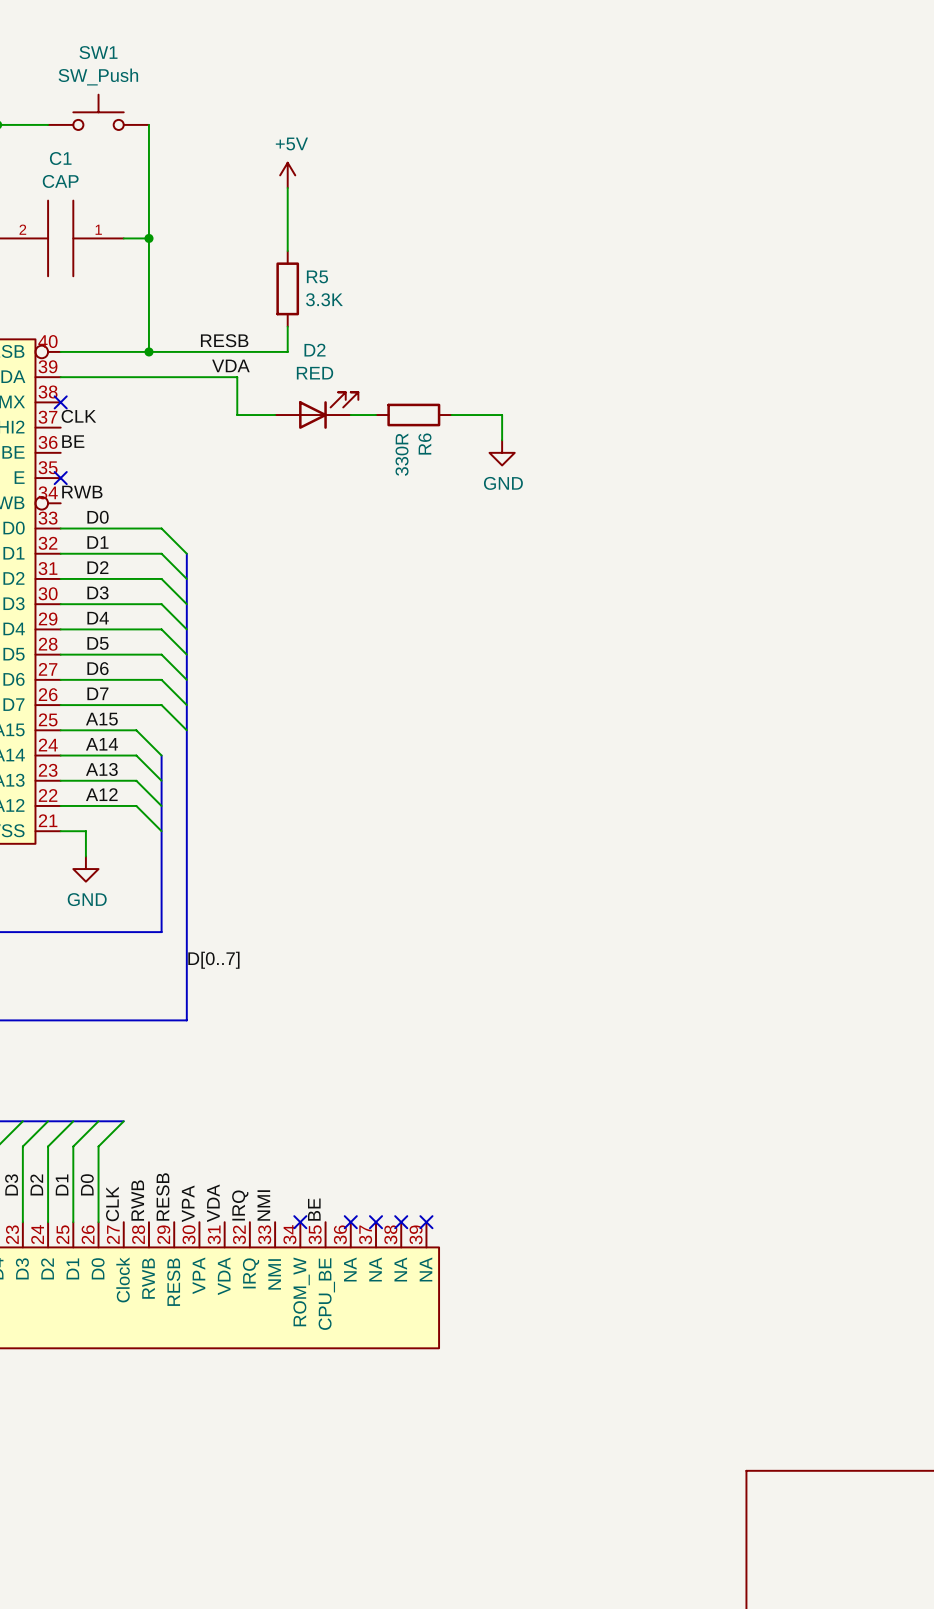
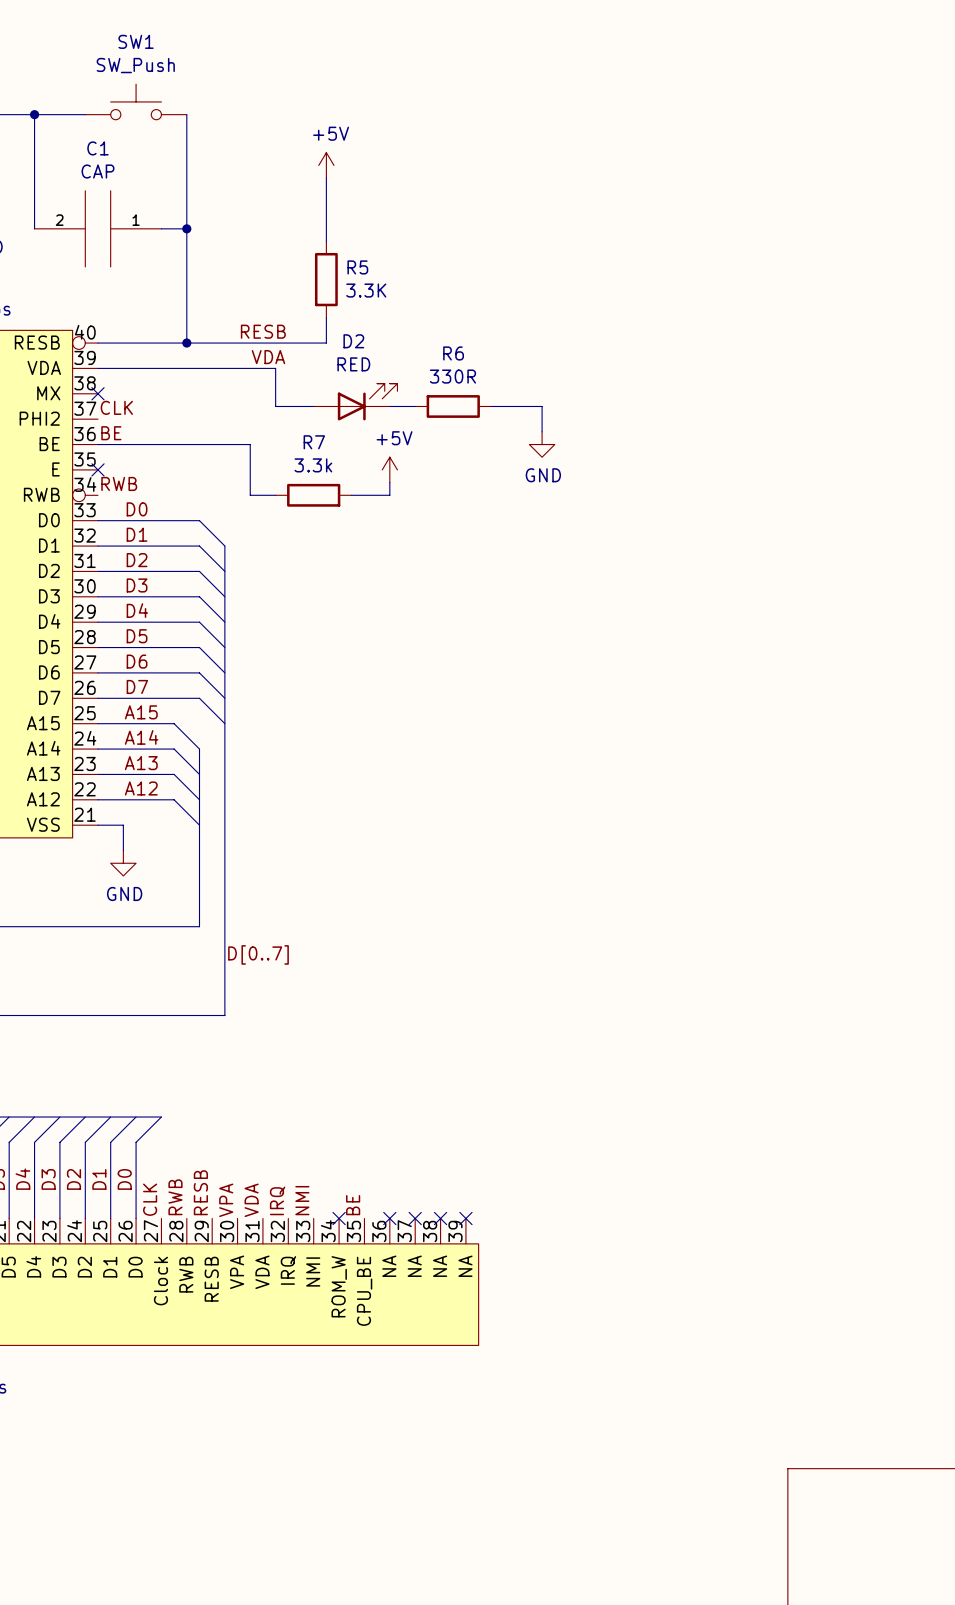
R6 name rotation: 0° (424, 444) -> 90° clockwise (453, 353)
R6 name position: R6 (424, 444) -> R6 (453, 353)
wire: none -> (97, 444) (250, 444) (250, 495) (275, 495)
R6 value rotation: 0° (402, 454) -> 90° clockwise (452, 376)
R6 value position: 330R (402, 454) -> 330R (452, 376)
power symbol: none -> +5V (389, 469)
wire: none -> (389, 482) (389, 495) (351, 495)
R7: none -> 3.3k (313, 495)

